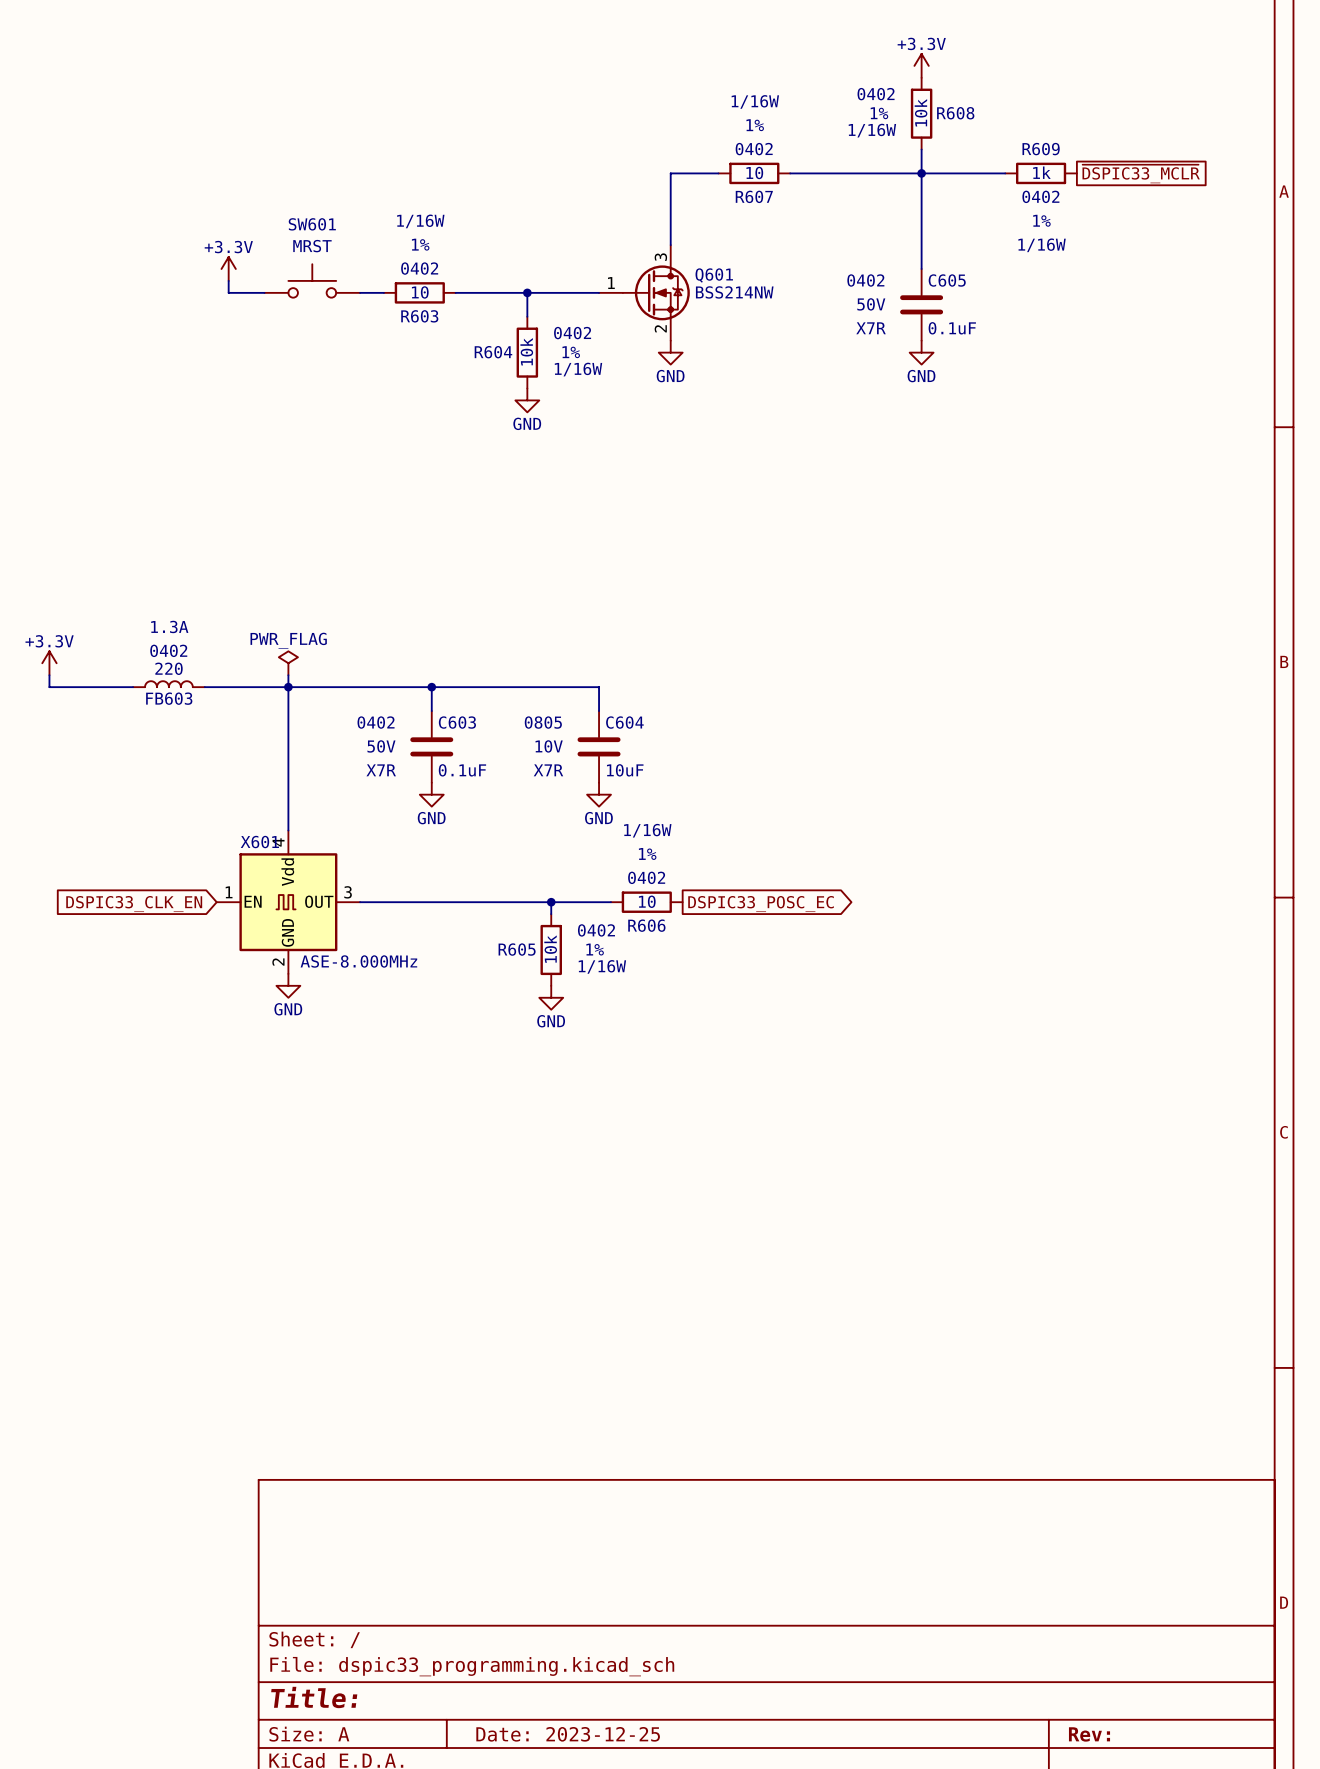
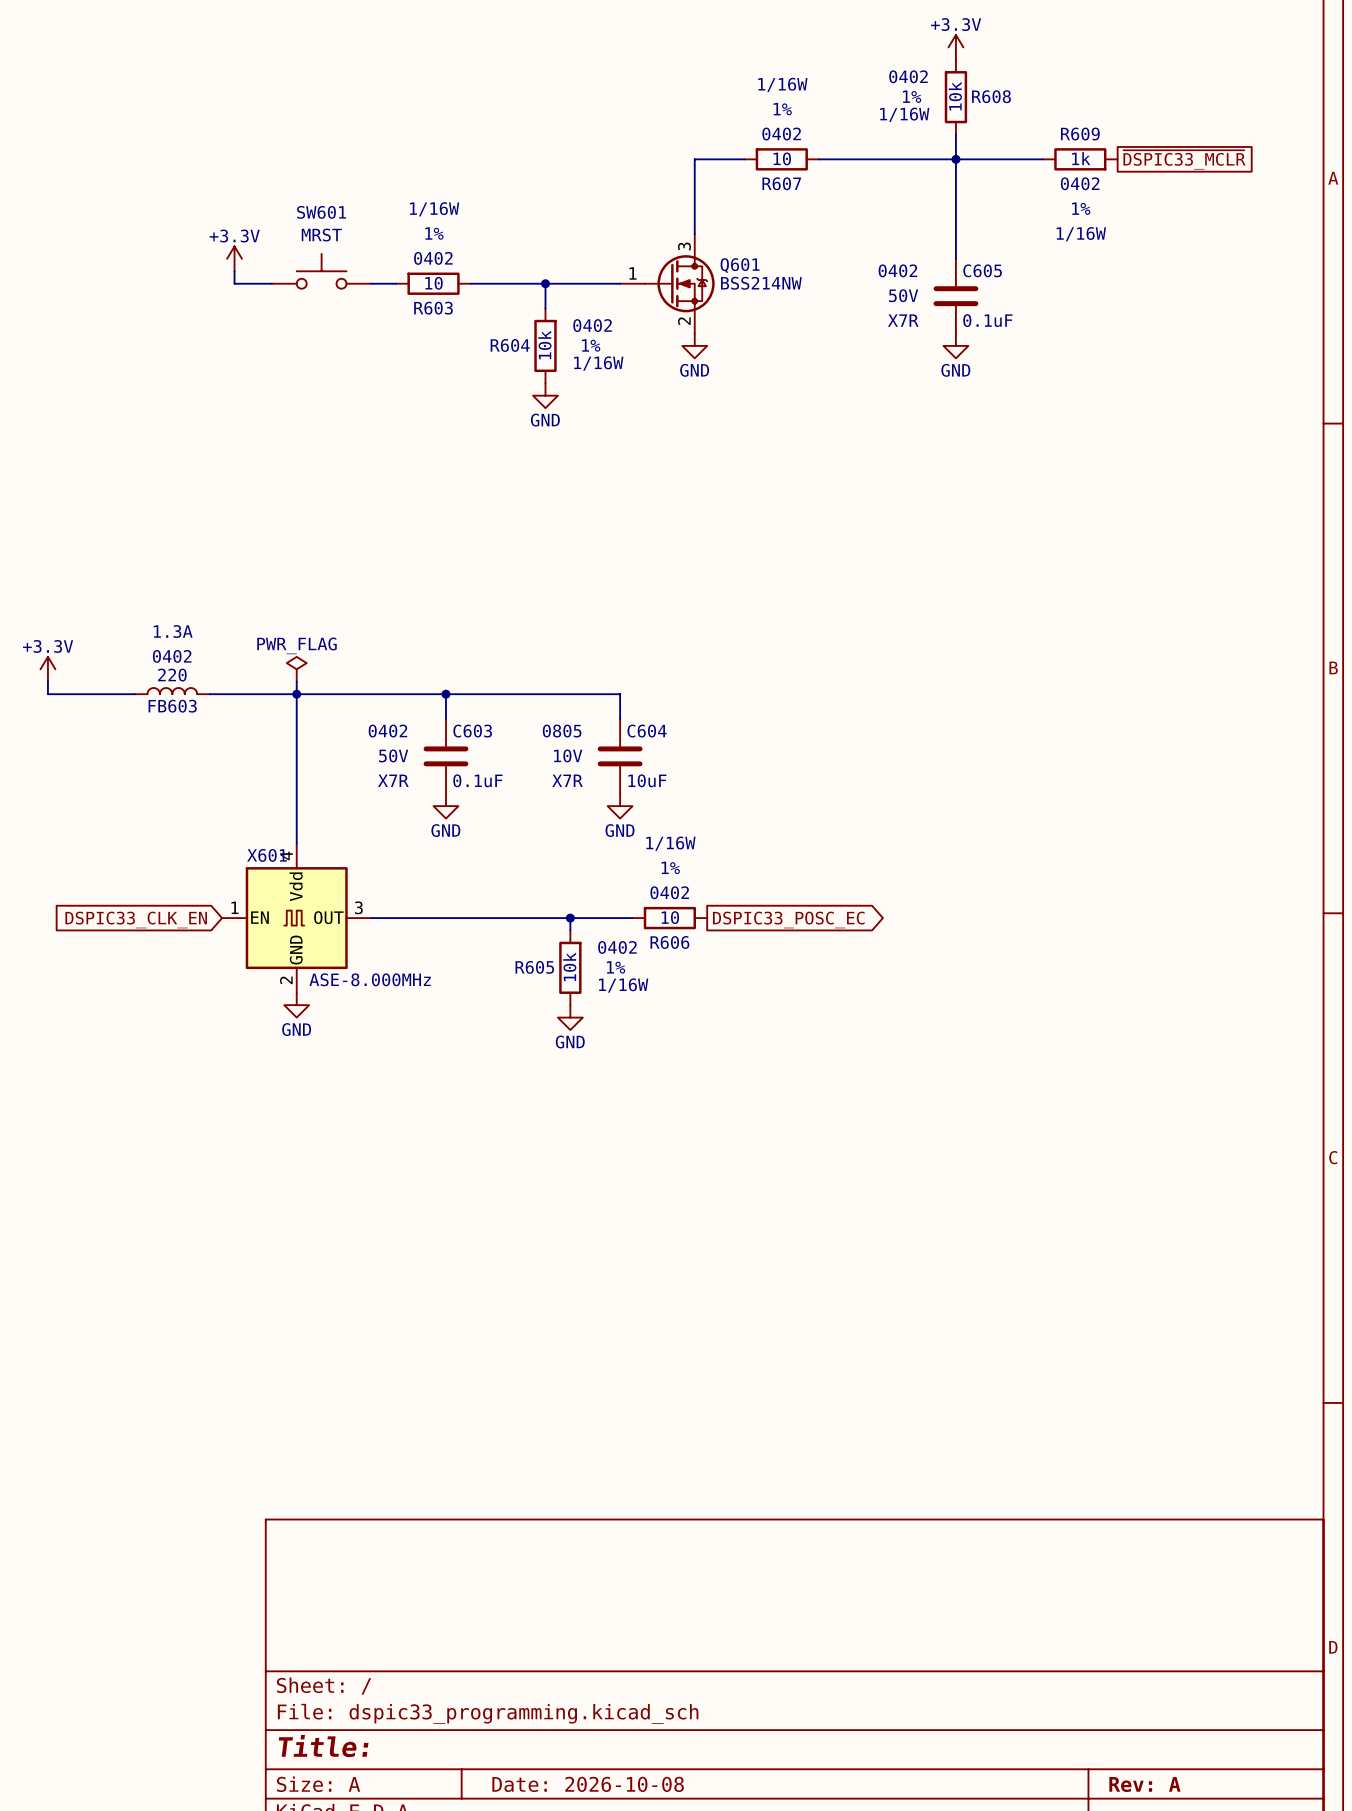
title block: Date: 2023-12-25 (568, 1734) -> Date: 2026-10-08 (588, 1784)
title block: Rev: (1089, 1734) -> Rev: A (1144, 1784)

